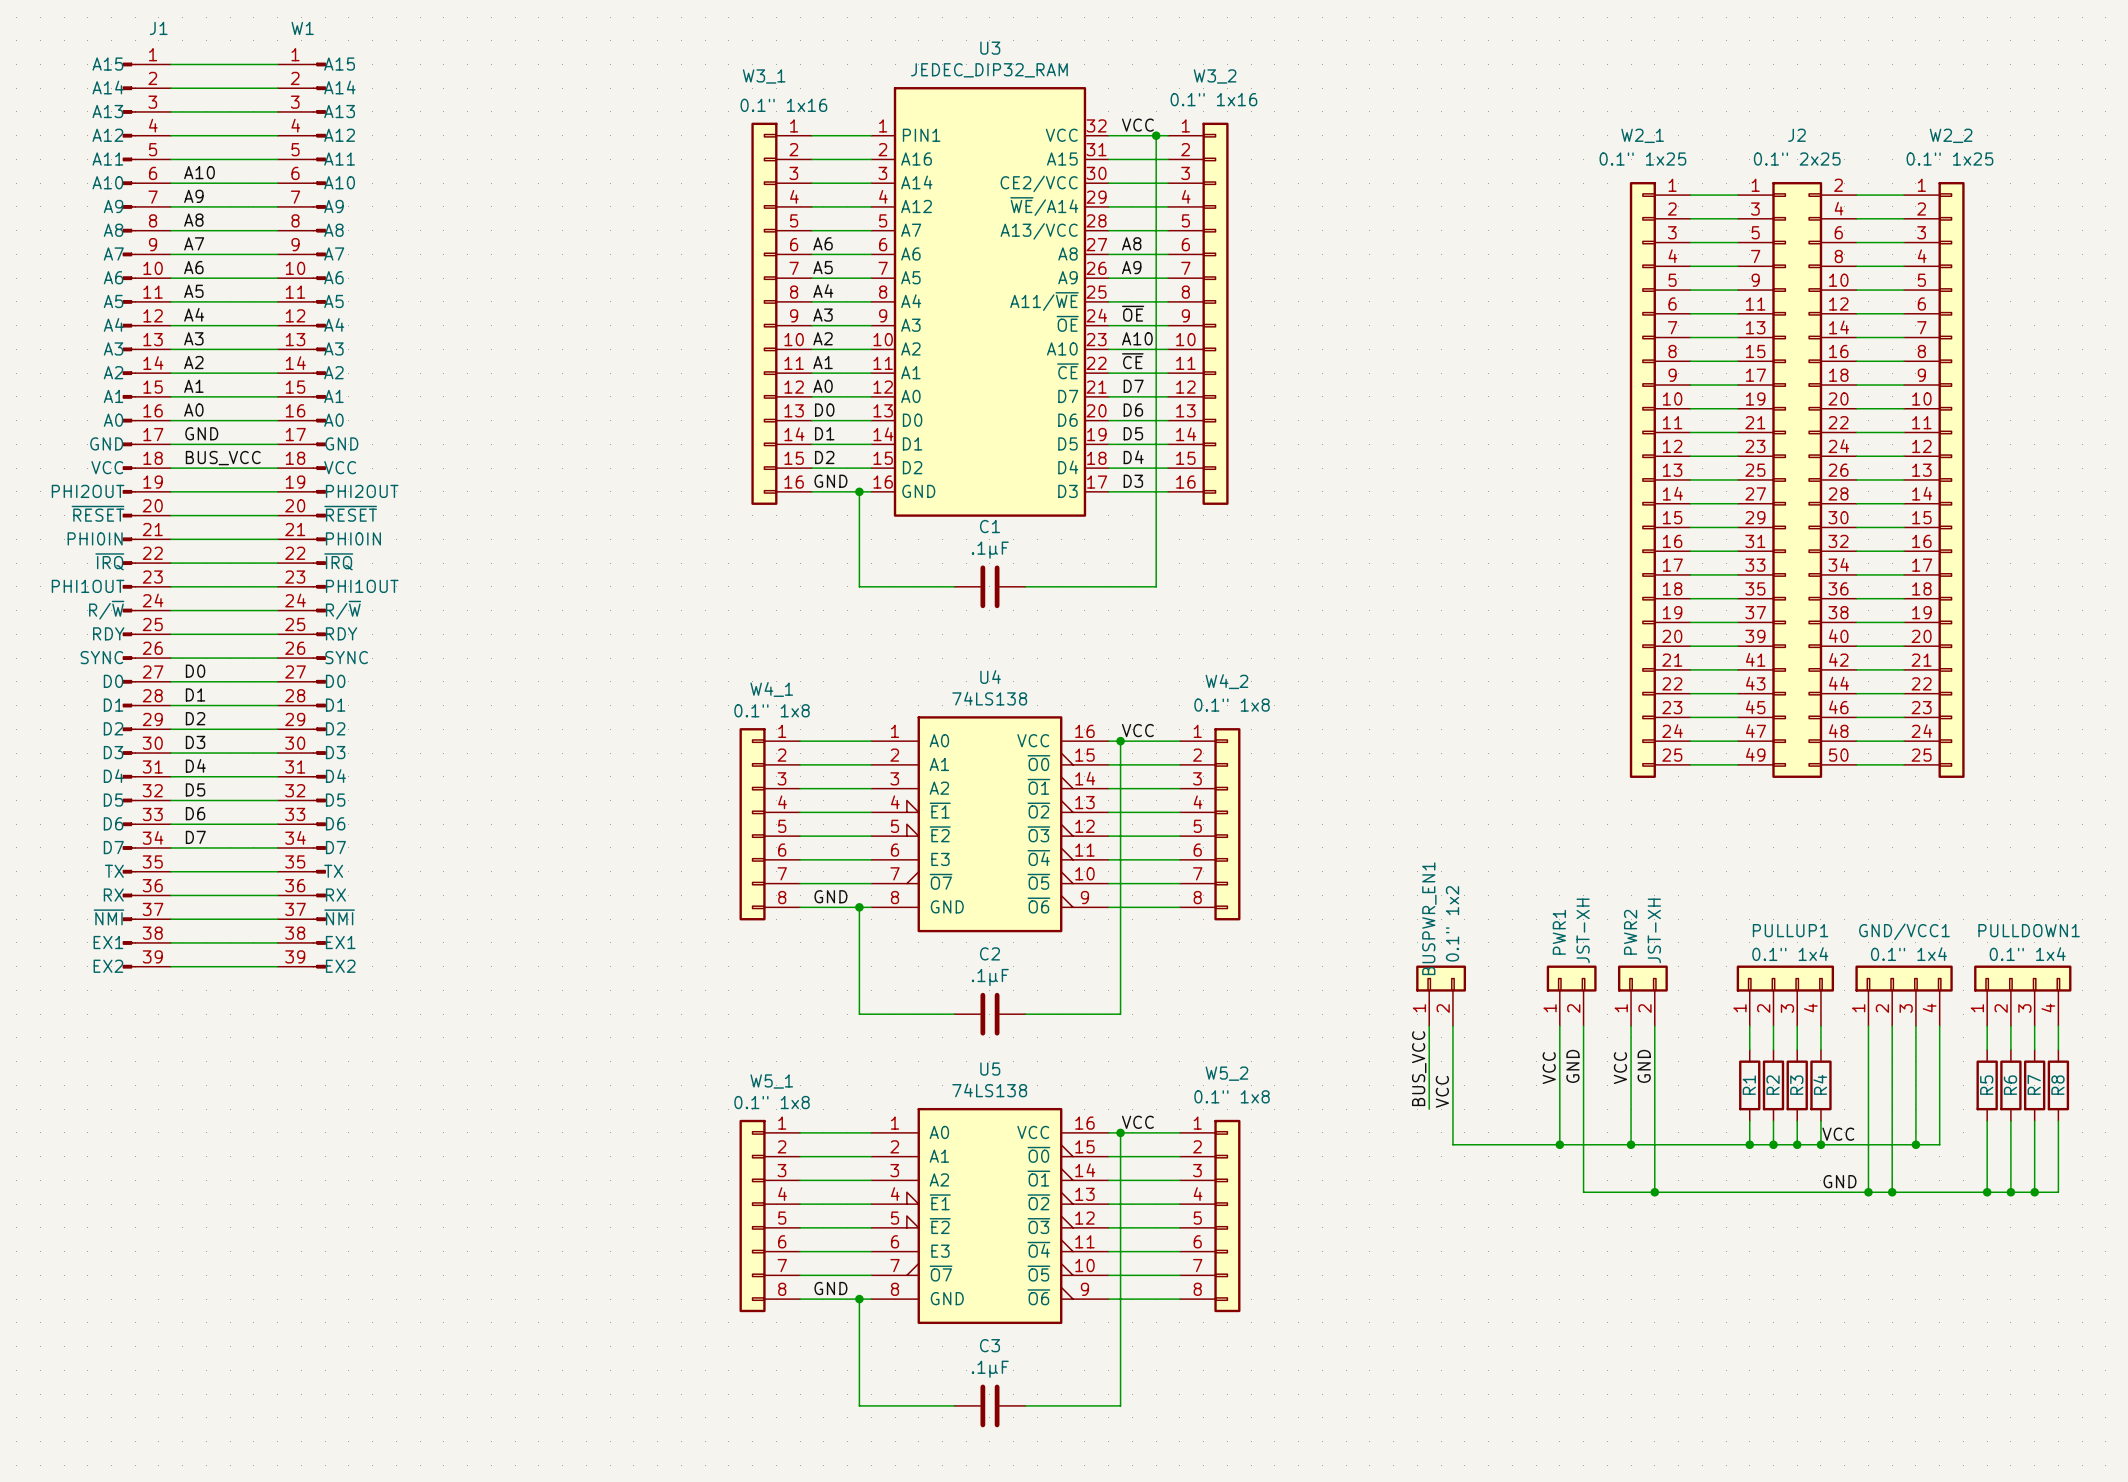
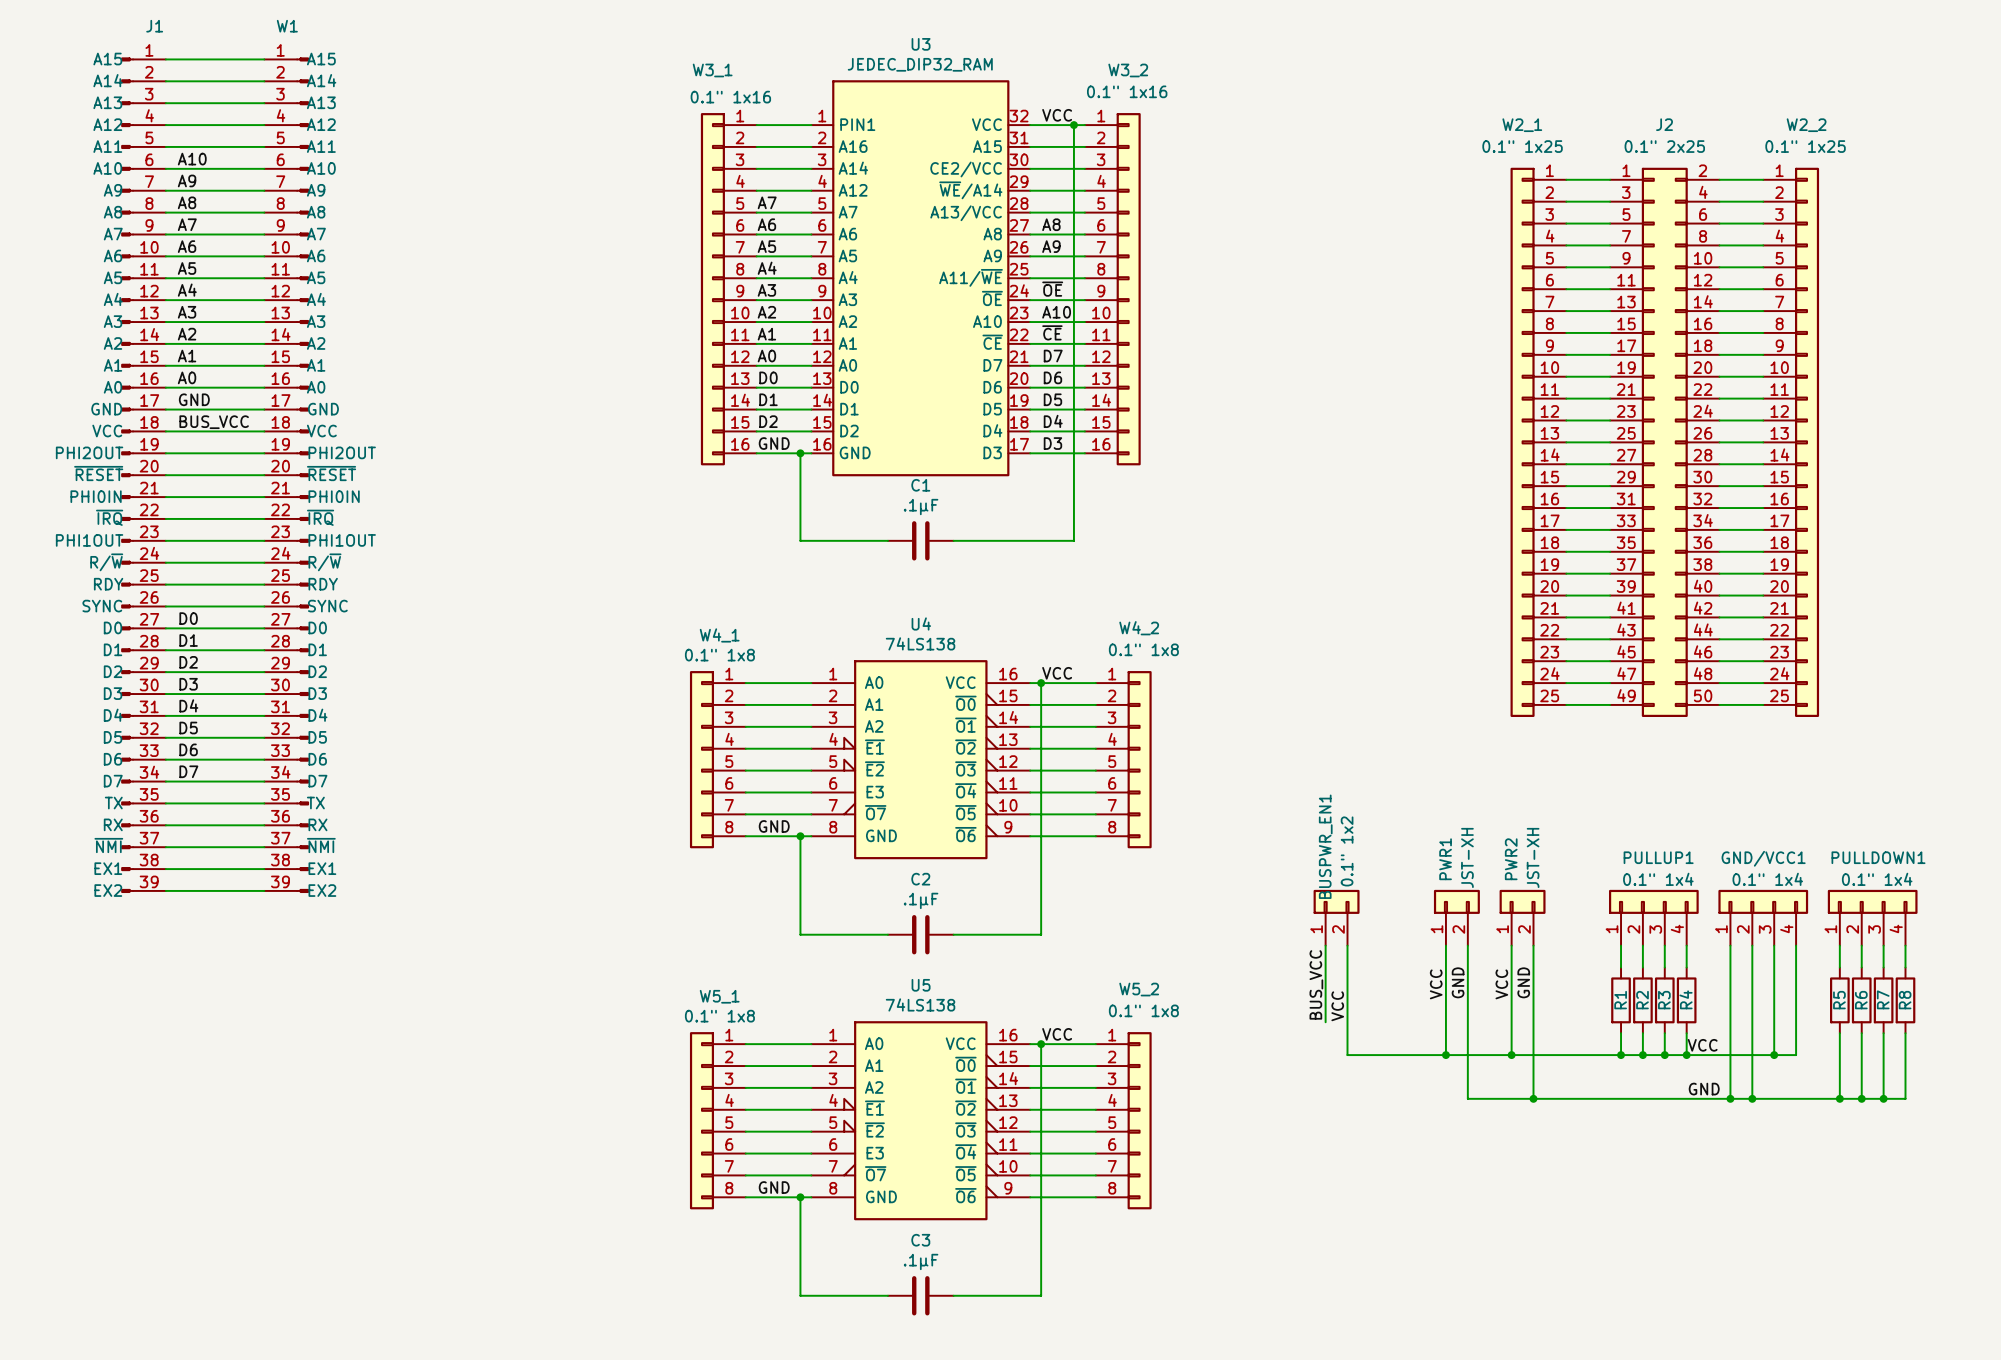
label: none -> A7 (767, 202)

